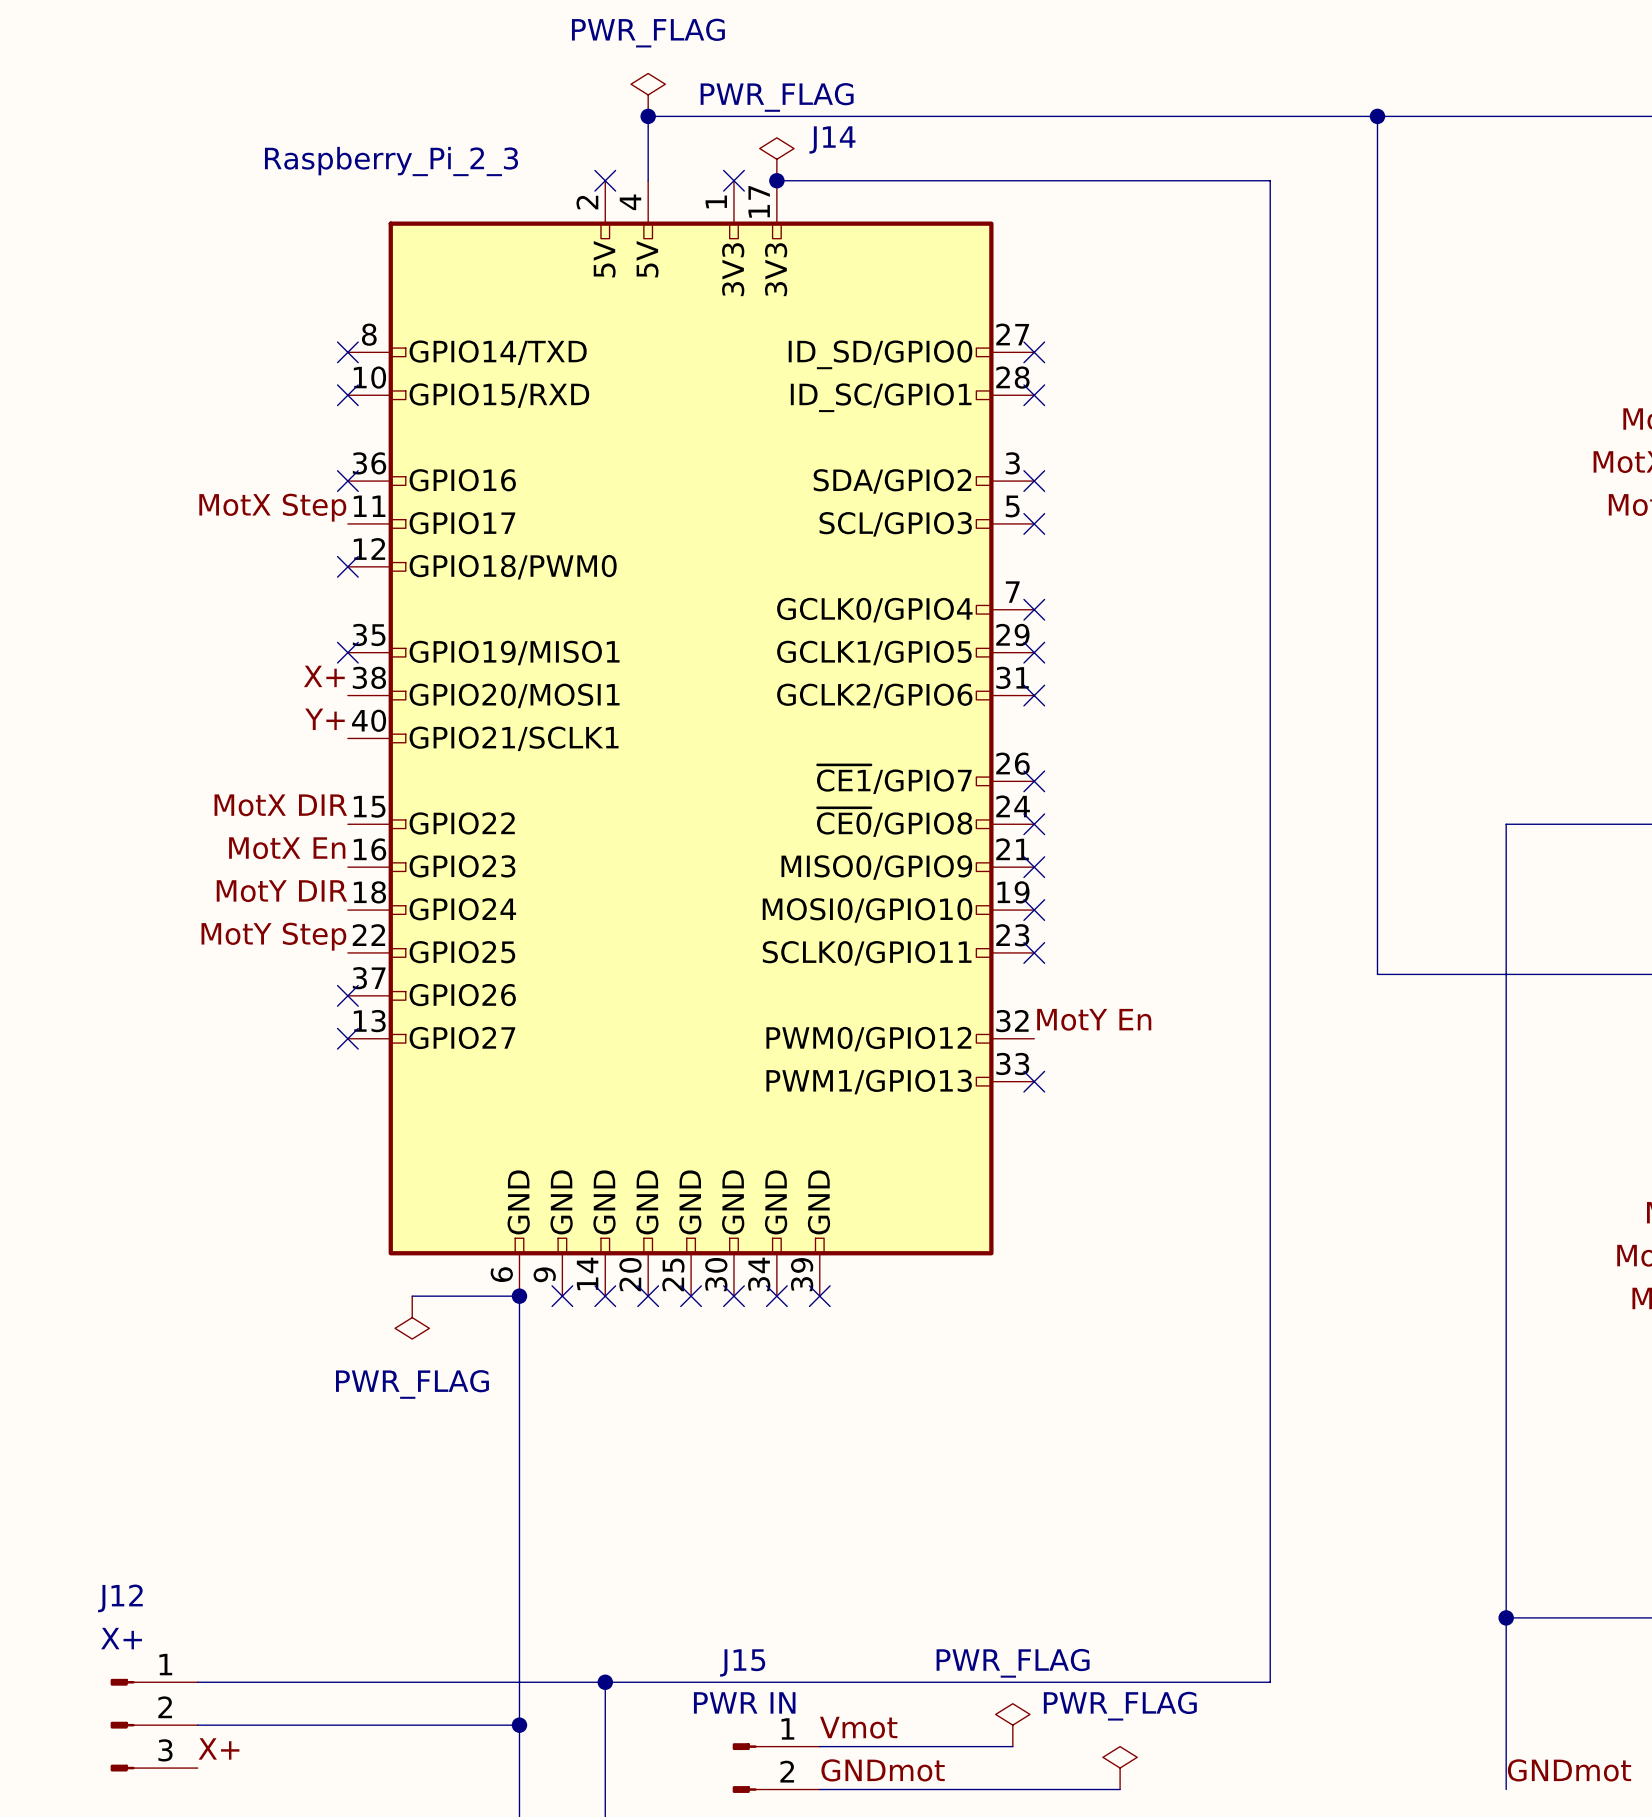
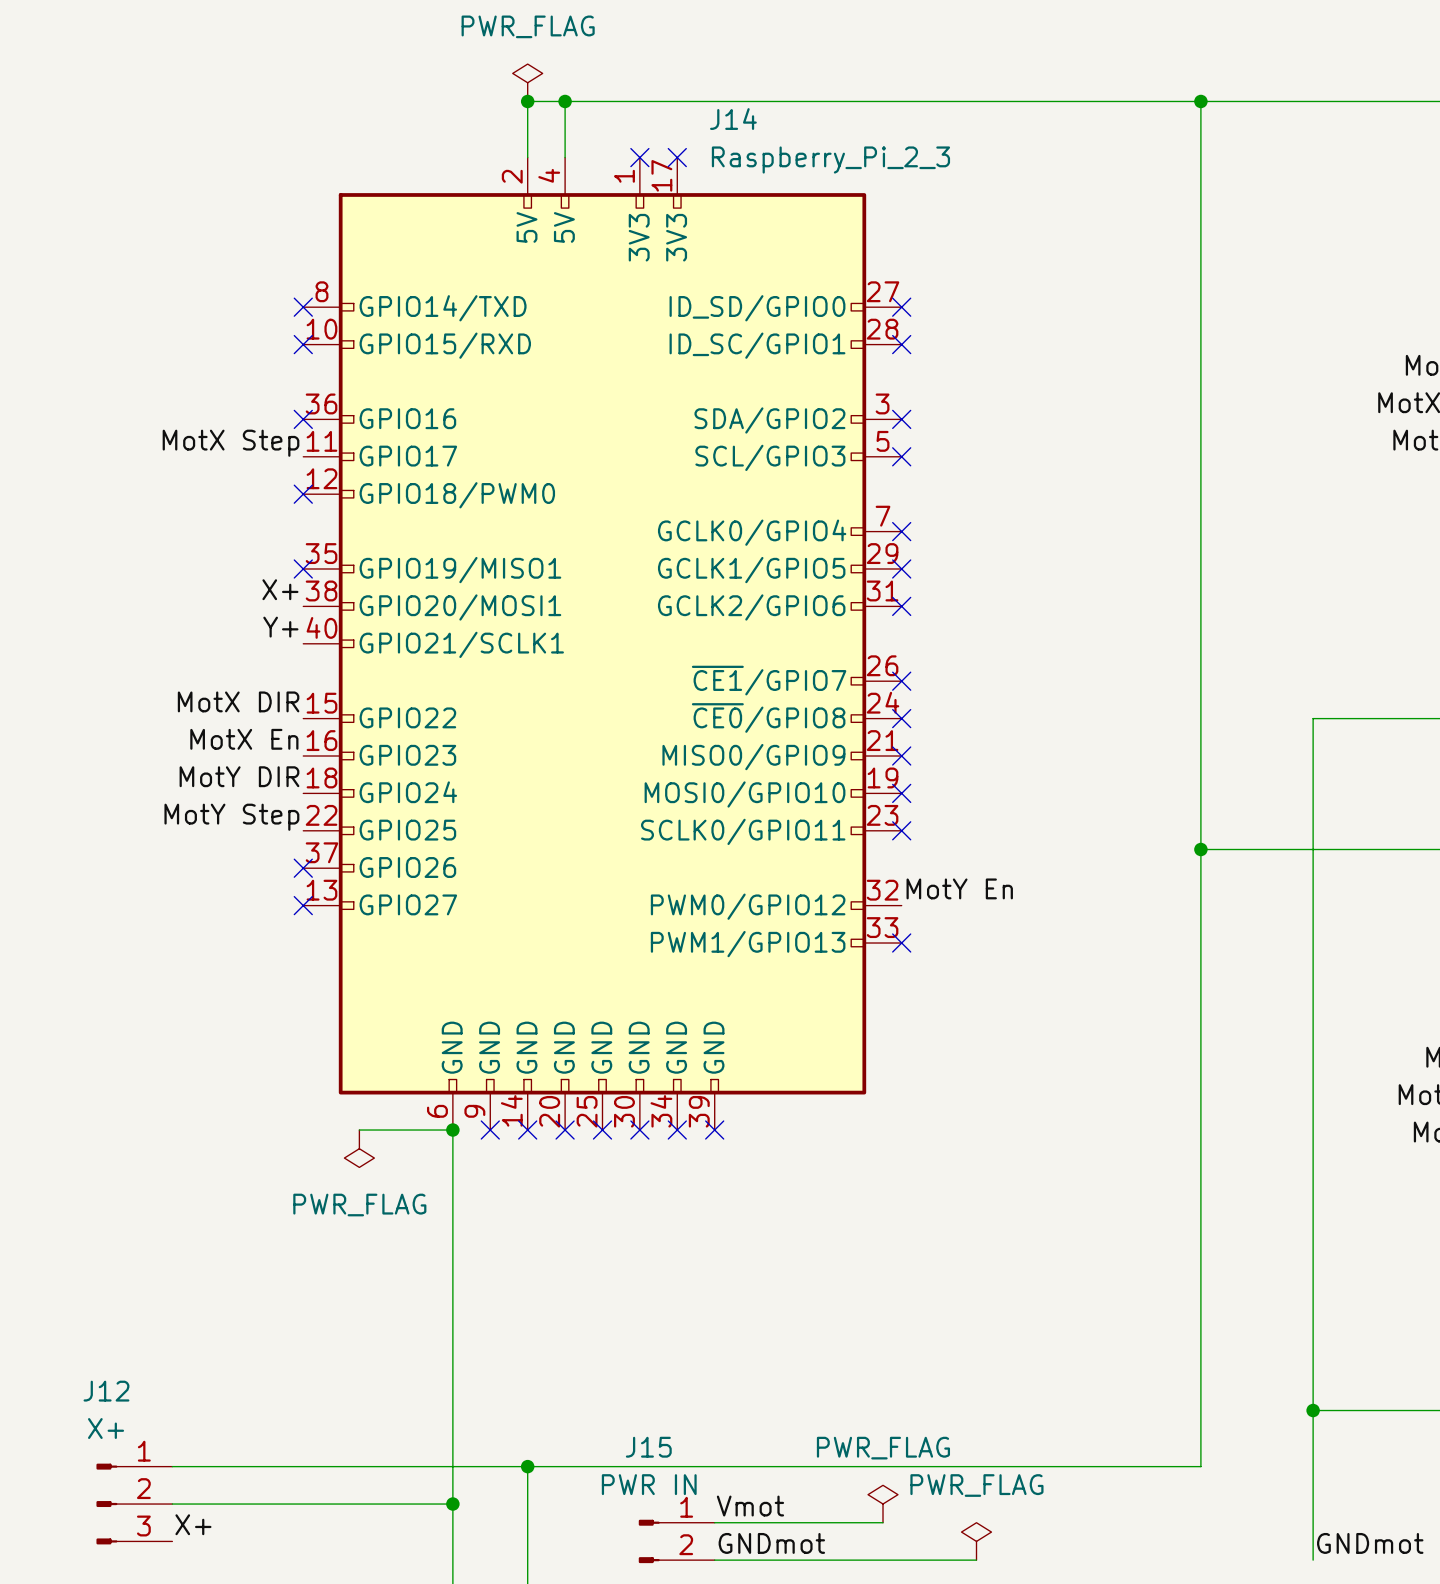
power symbol position: PWR_FLAG (648, 94) -> PWR_FLAG (527, 82)
junction: none -> (527, 101)
wire: none -> (565, 101) (527, 101) (527, 157)
power symbol: PWR_FLAG (776, 159) -> none
J14 value position: Raspberry_Pi_2_3 (391, 161) -> Raspberry_Pi_2_3 (830, 160)
no-connect mark: (605, 180) -> none
wire: (776, 180) (1270, 180) (1270, 1682) -> (1200, 849) (1200, 1466) (1107, 1466)
junction: (776, 180) -> none
no-connect mark: none -> (677, 157)
junction: none -> (1200, 849)

